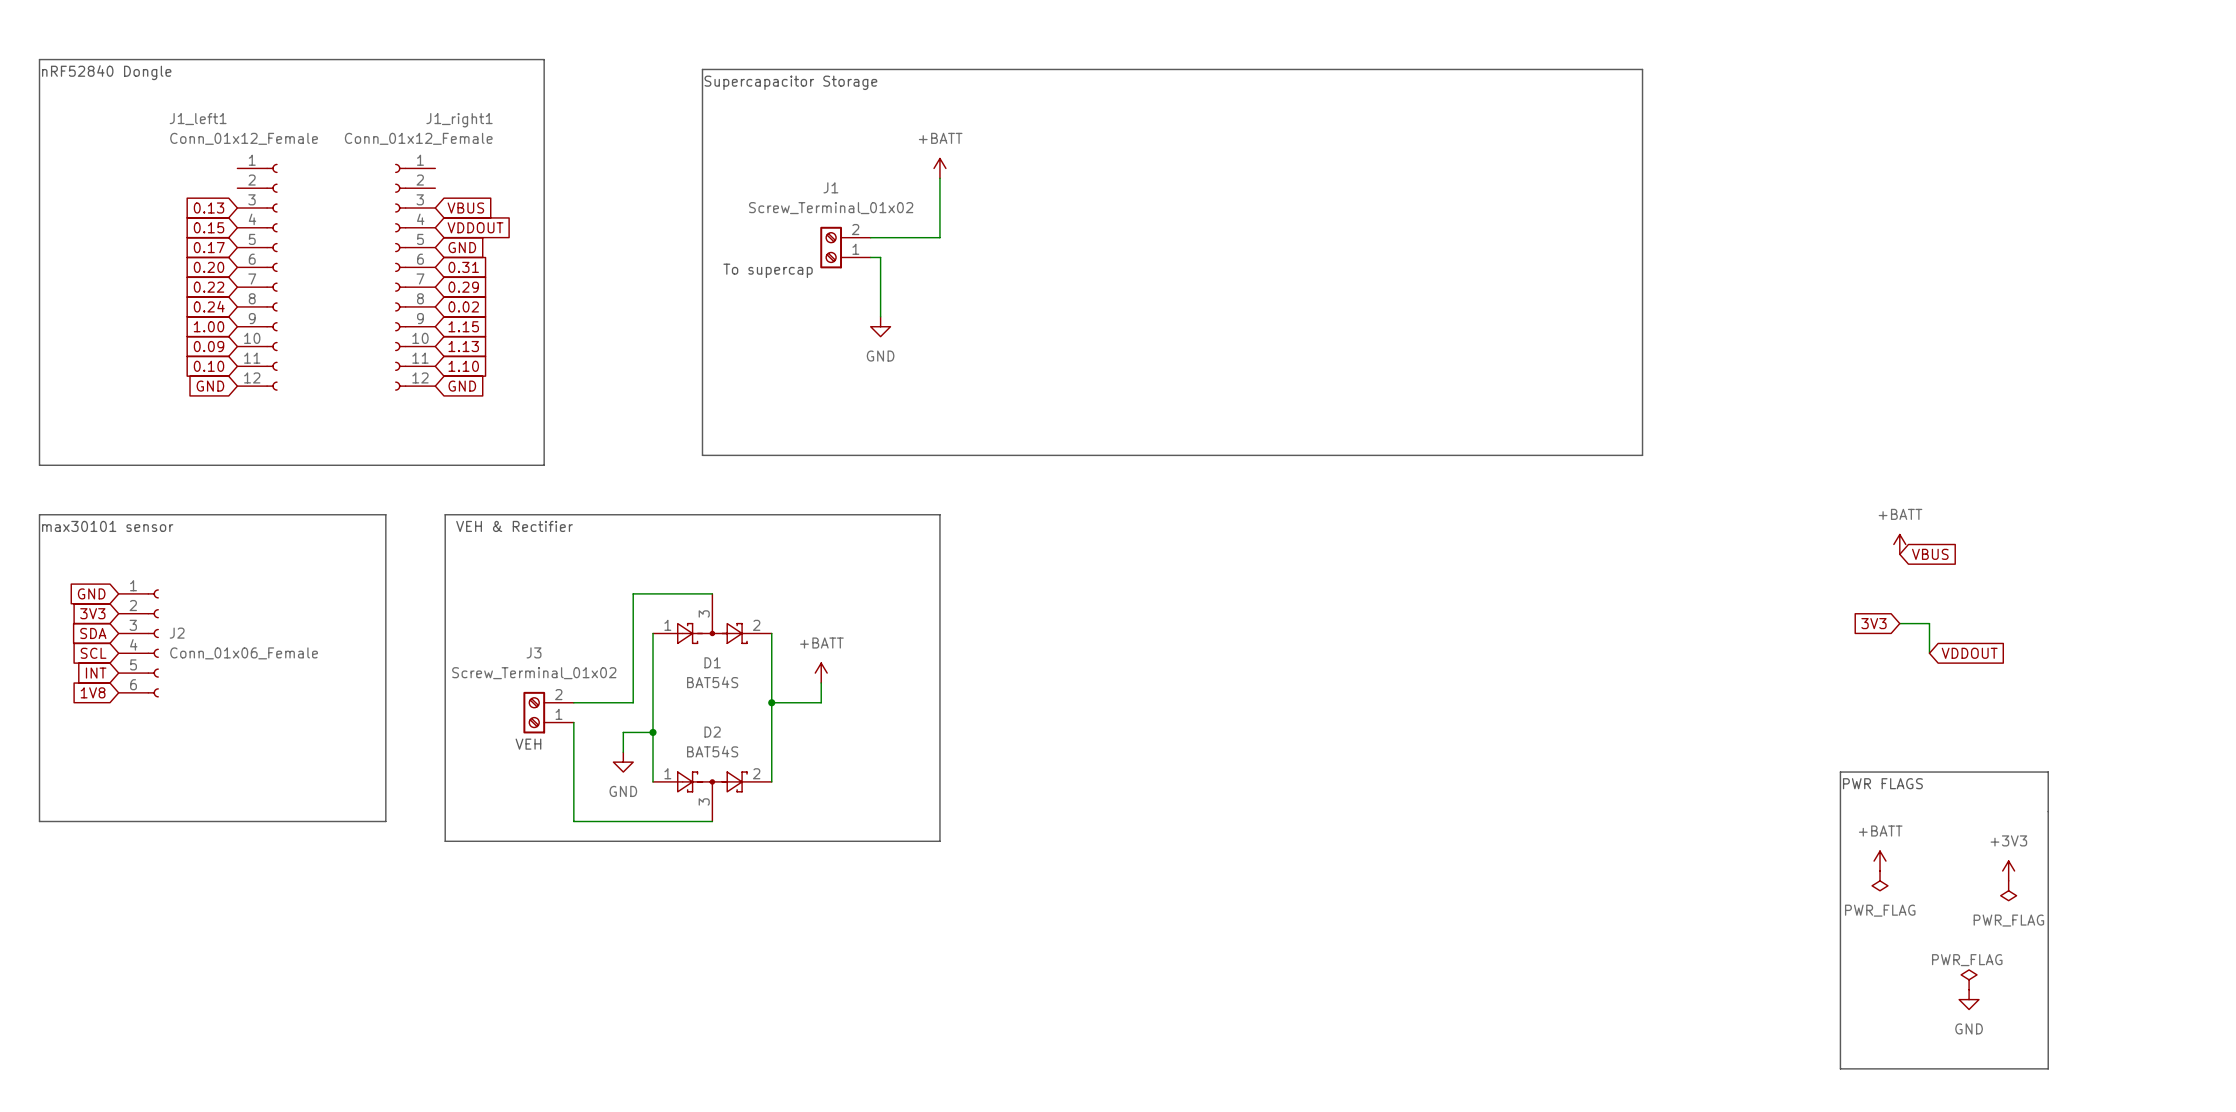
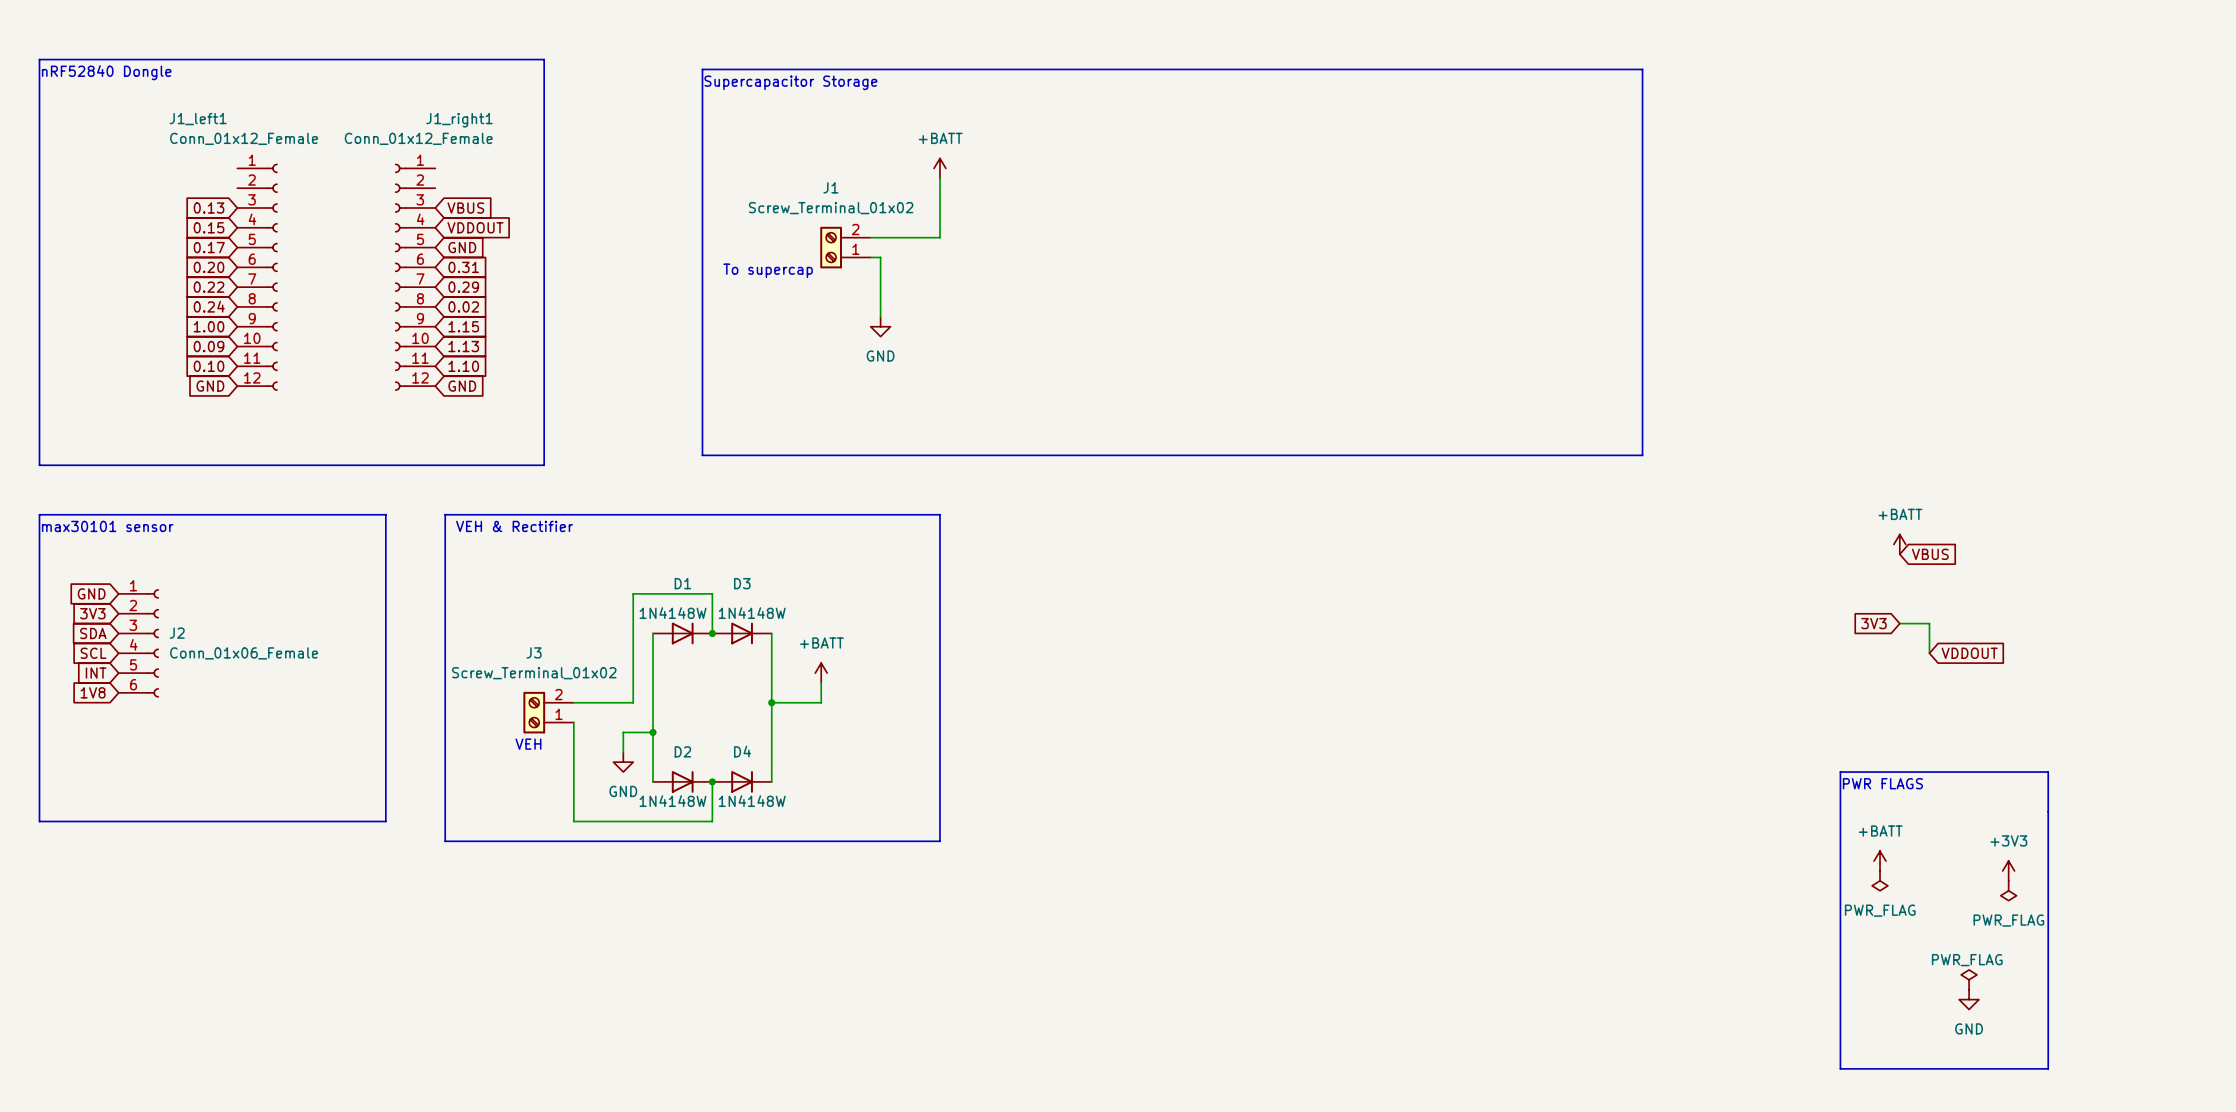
D1 symbol: [653, 593, 772, 644] -> [653, 622, 713, 645]
junction: none -> (712, 633)
D3: none -> 1N4148W (742, 633)
D1 name position: D1 (712, 662) -> D1 (682, 583)
D1 value: BAT54S (712, 682) -> 1N4148W (673, 613)
D2 name position: D2 (712, 732) -> D2 (682, 751)
D2 value: BAT54S (712, 751) -> 1N4148W (673, 801)
D2 symbol: [653, 772, 772, 822] -> [653, 771, 713, 793]
junction: none -> (712, 781)
D4: none -> 1N4148W (742, 781)

